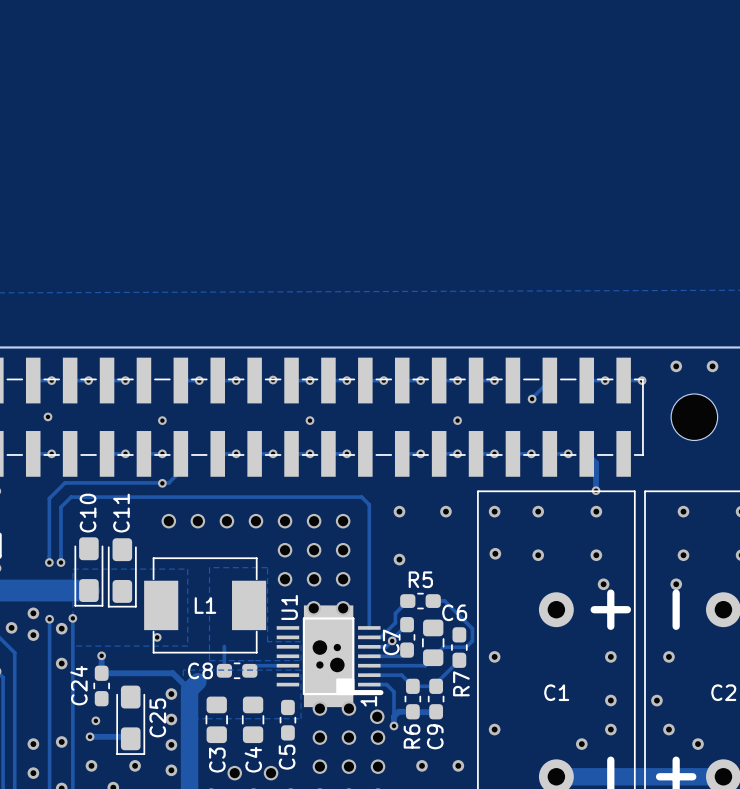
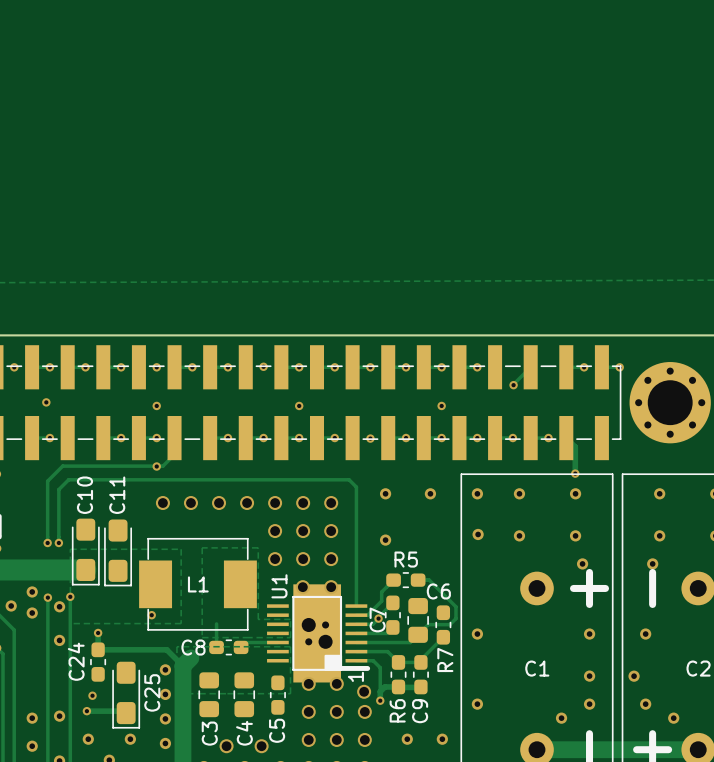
via: (676, 366) -> none
via: (712, 366) -> none
via: none -> (14, 367)
via: none -> (156, 367)
part footprint: [671, 393, 718, 441] -> [629, 362, 711, 444]
via: none -> (370, 438)

